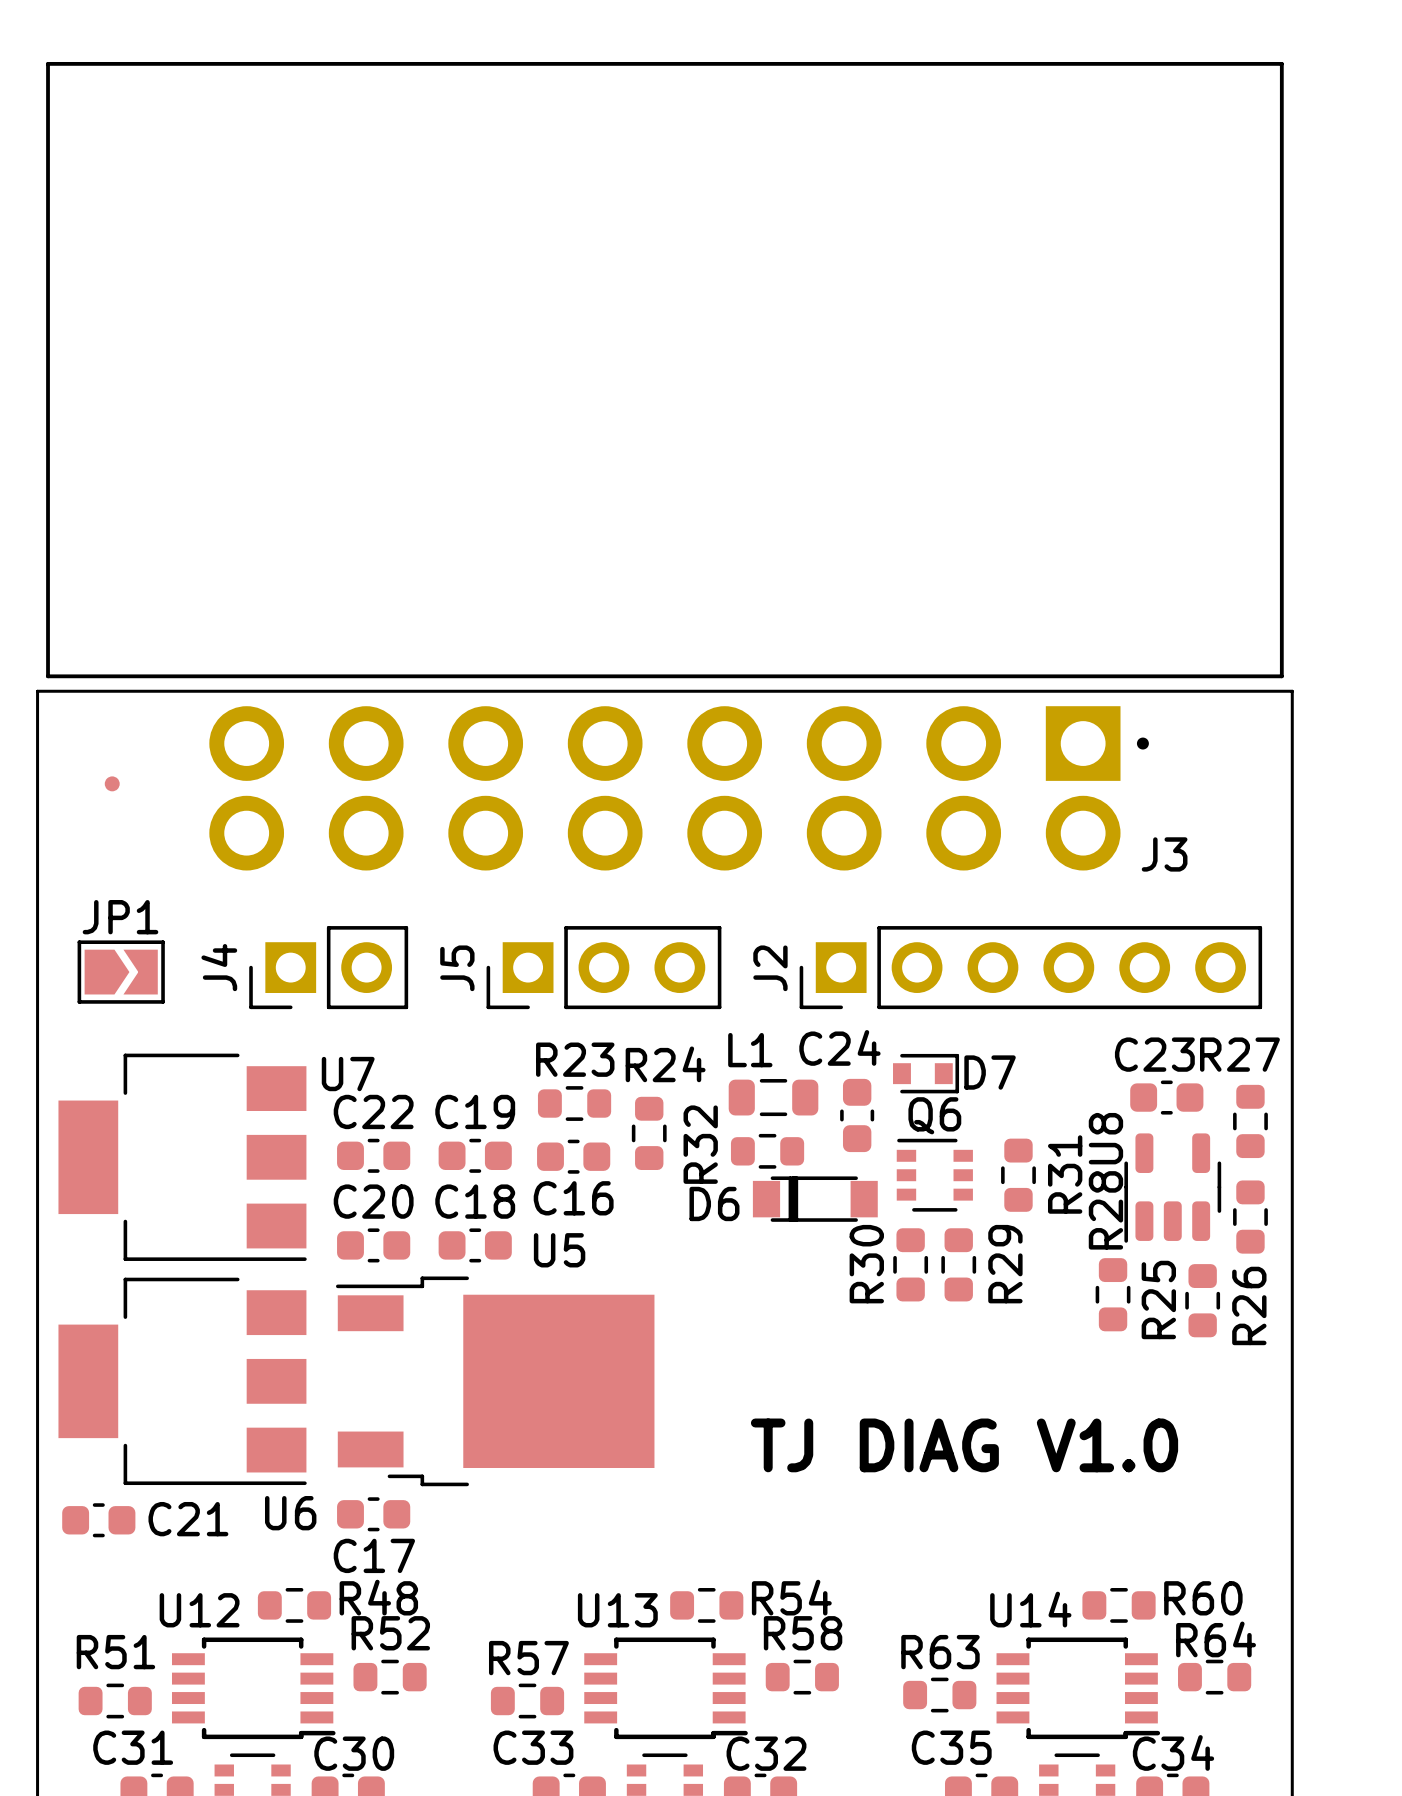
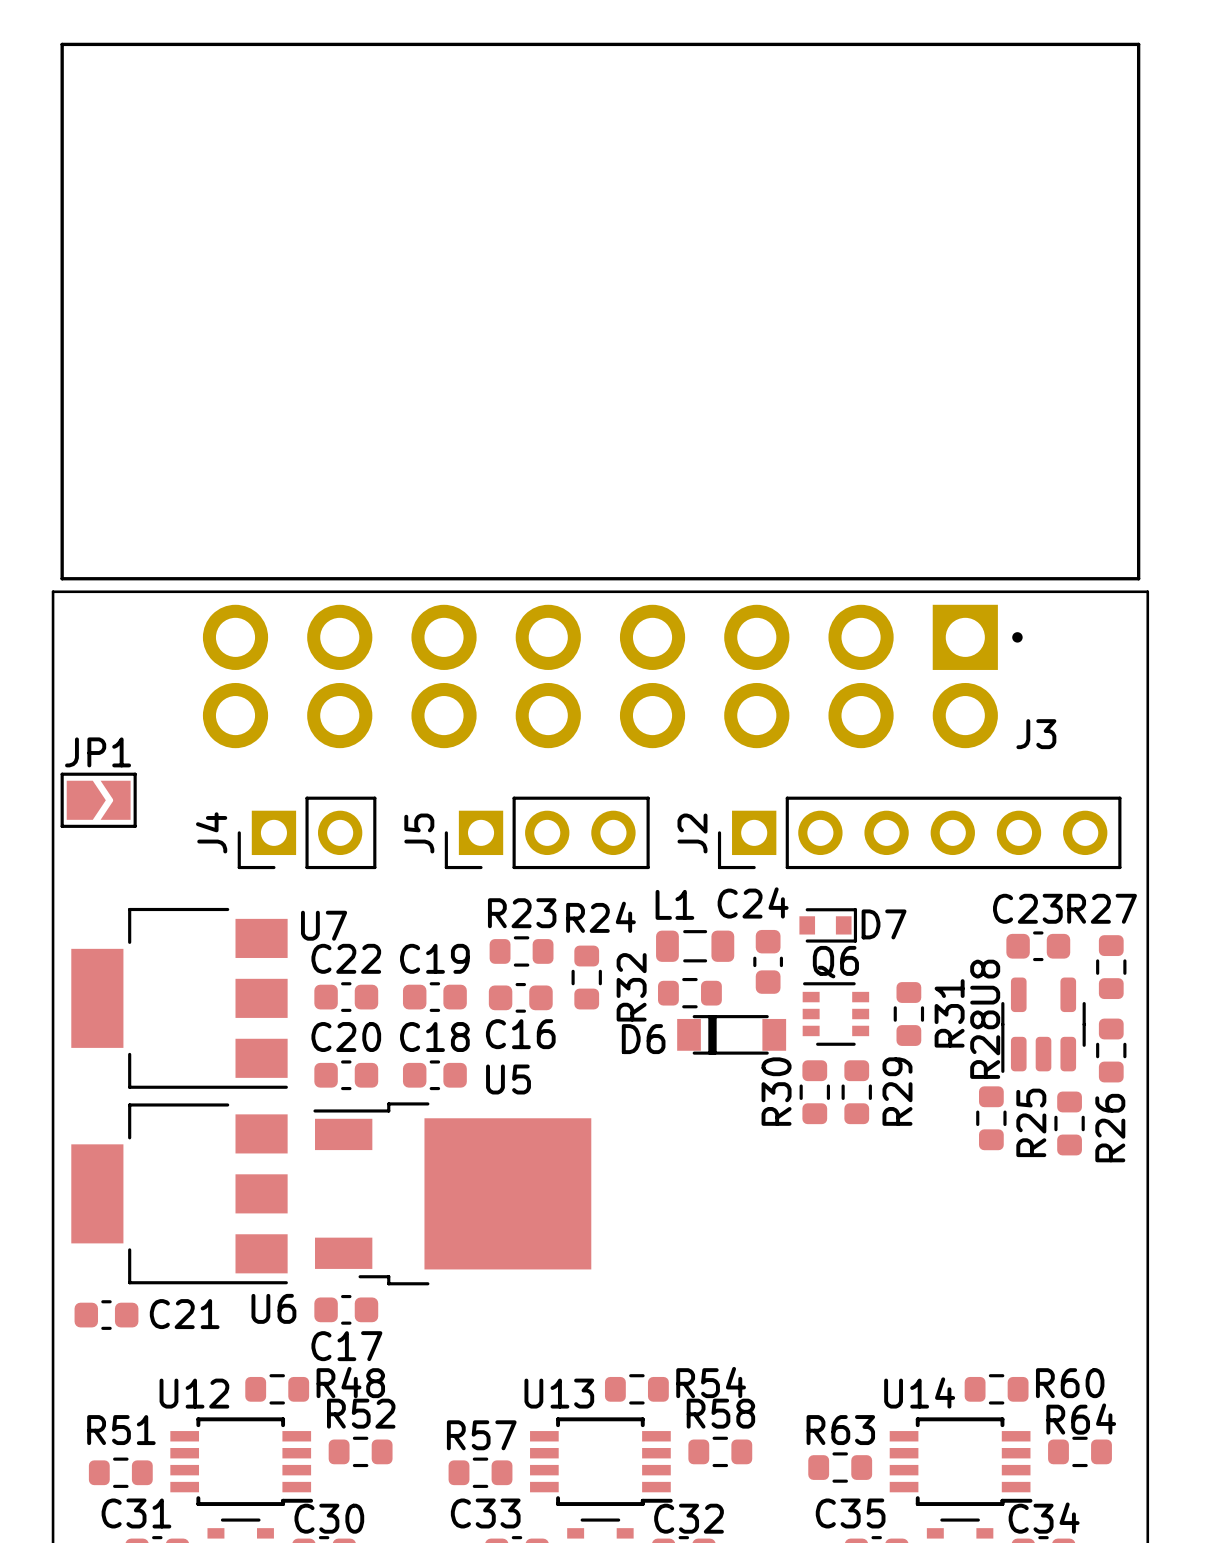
part: (112, 783) -> none
JP1 position: (121, 972) -> (98, 800)
text: TJ DIAG V1.0 (964, 1445) -> none

